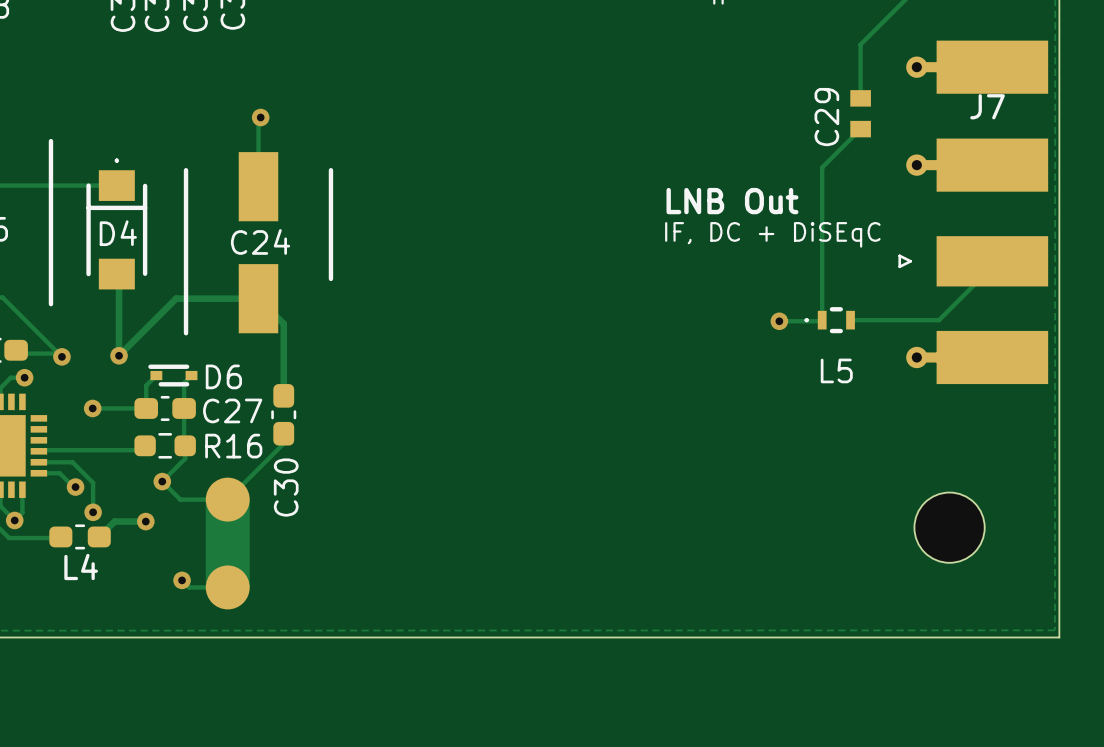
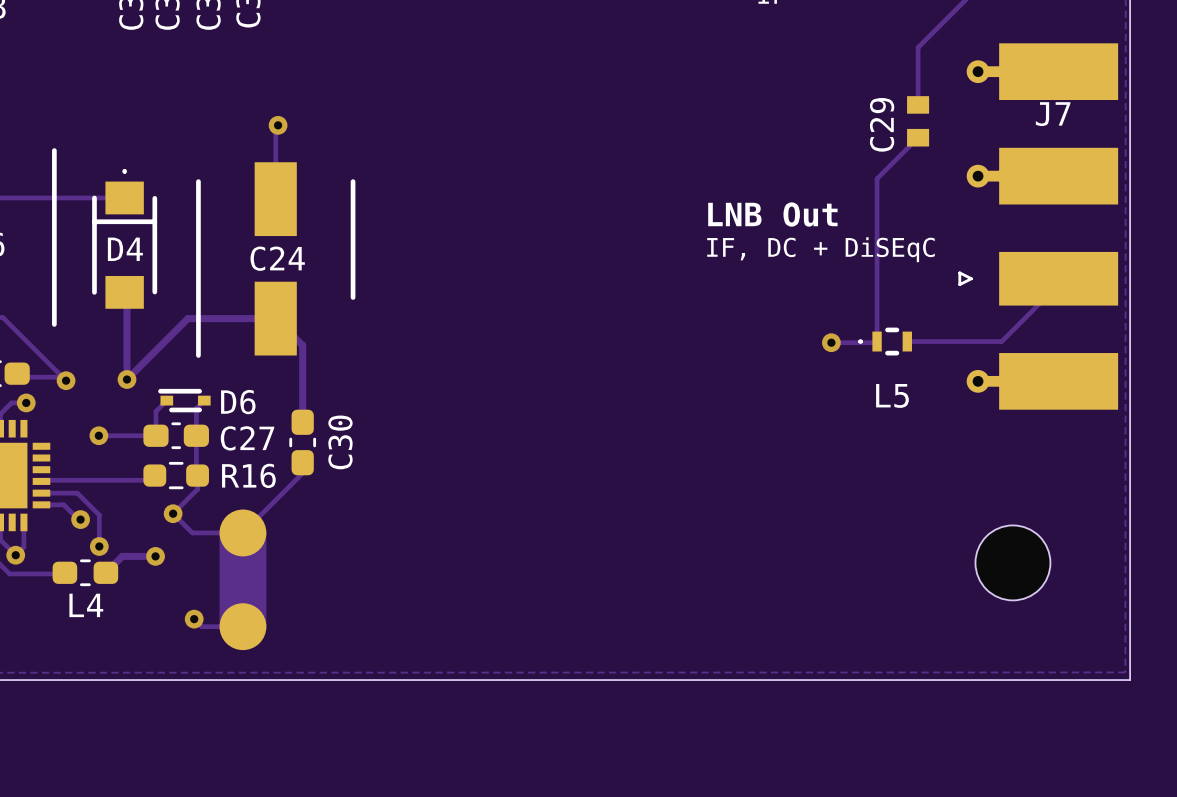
C30 name position: C30 (286, 487) -> C30 (340, 442)

